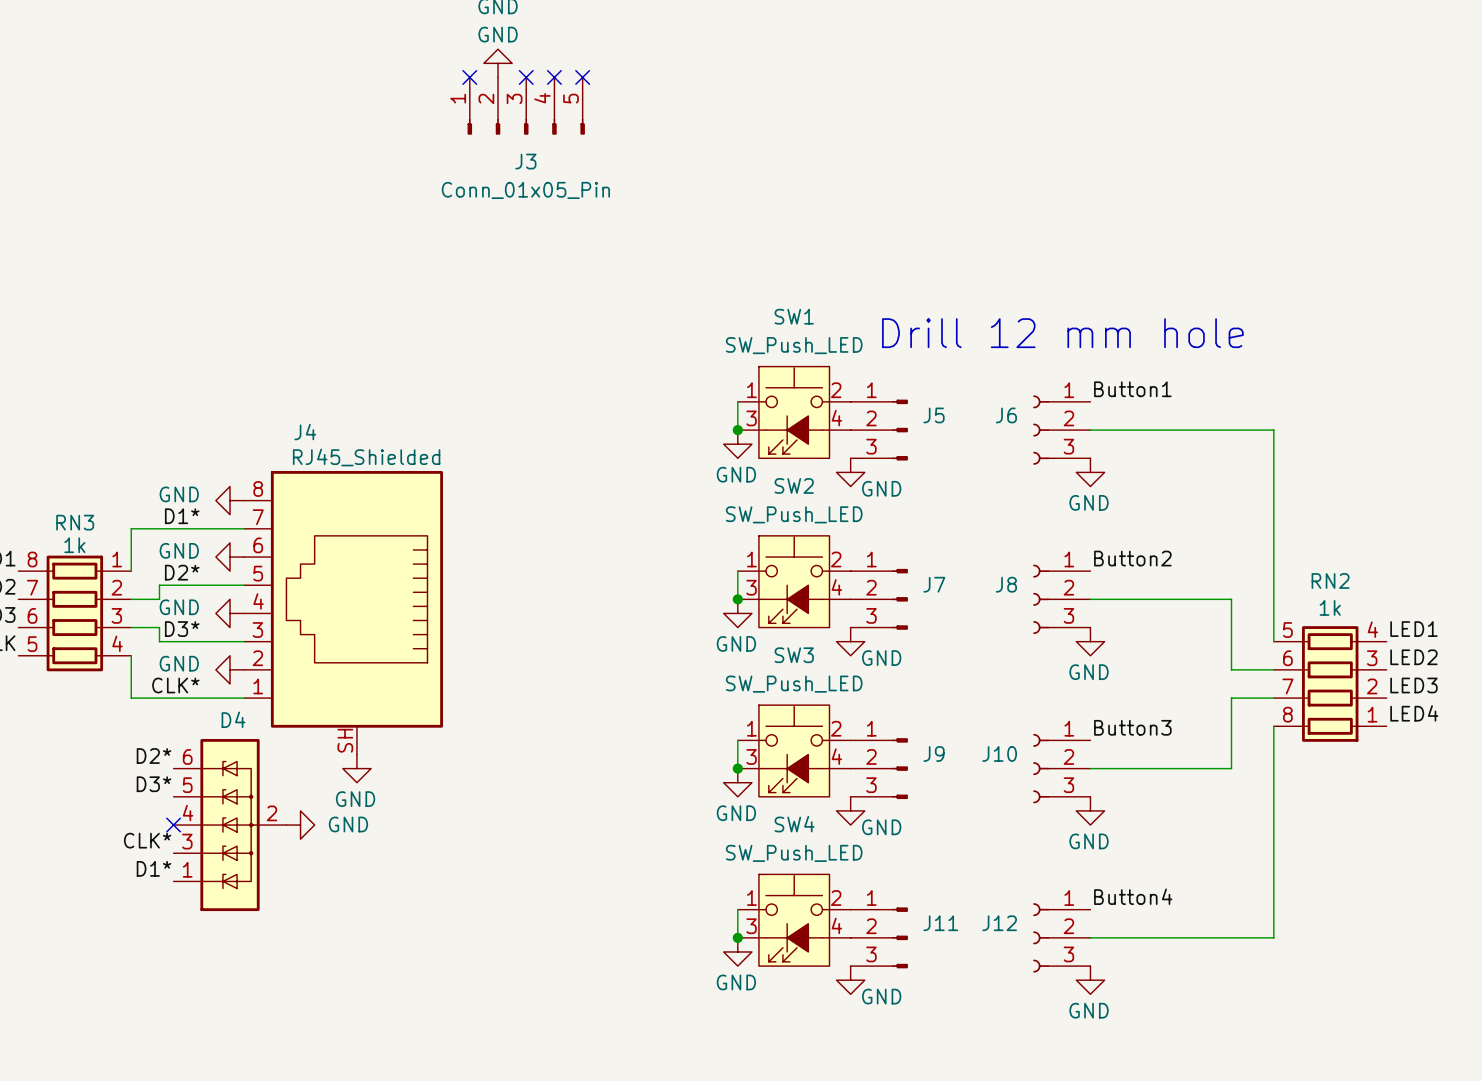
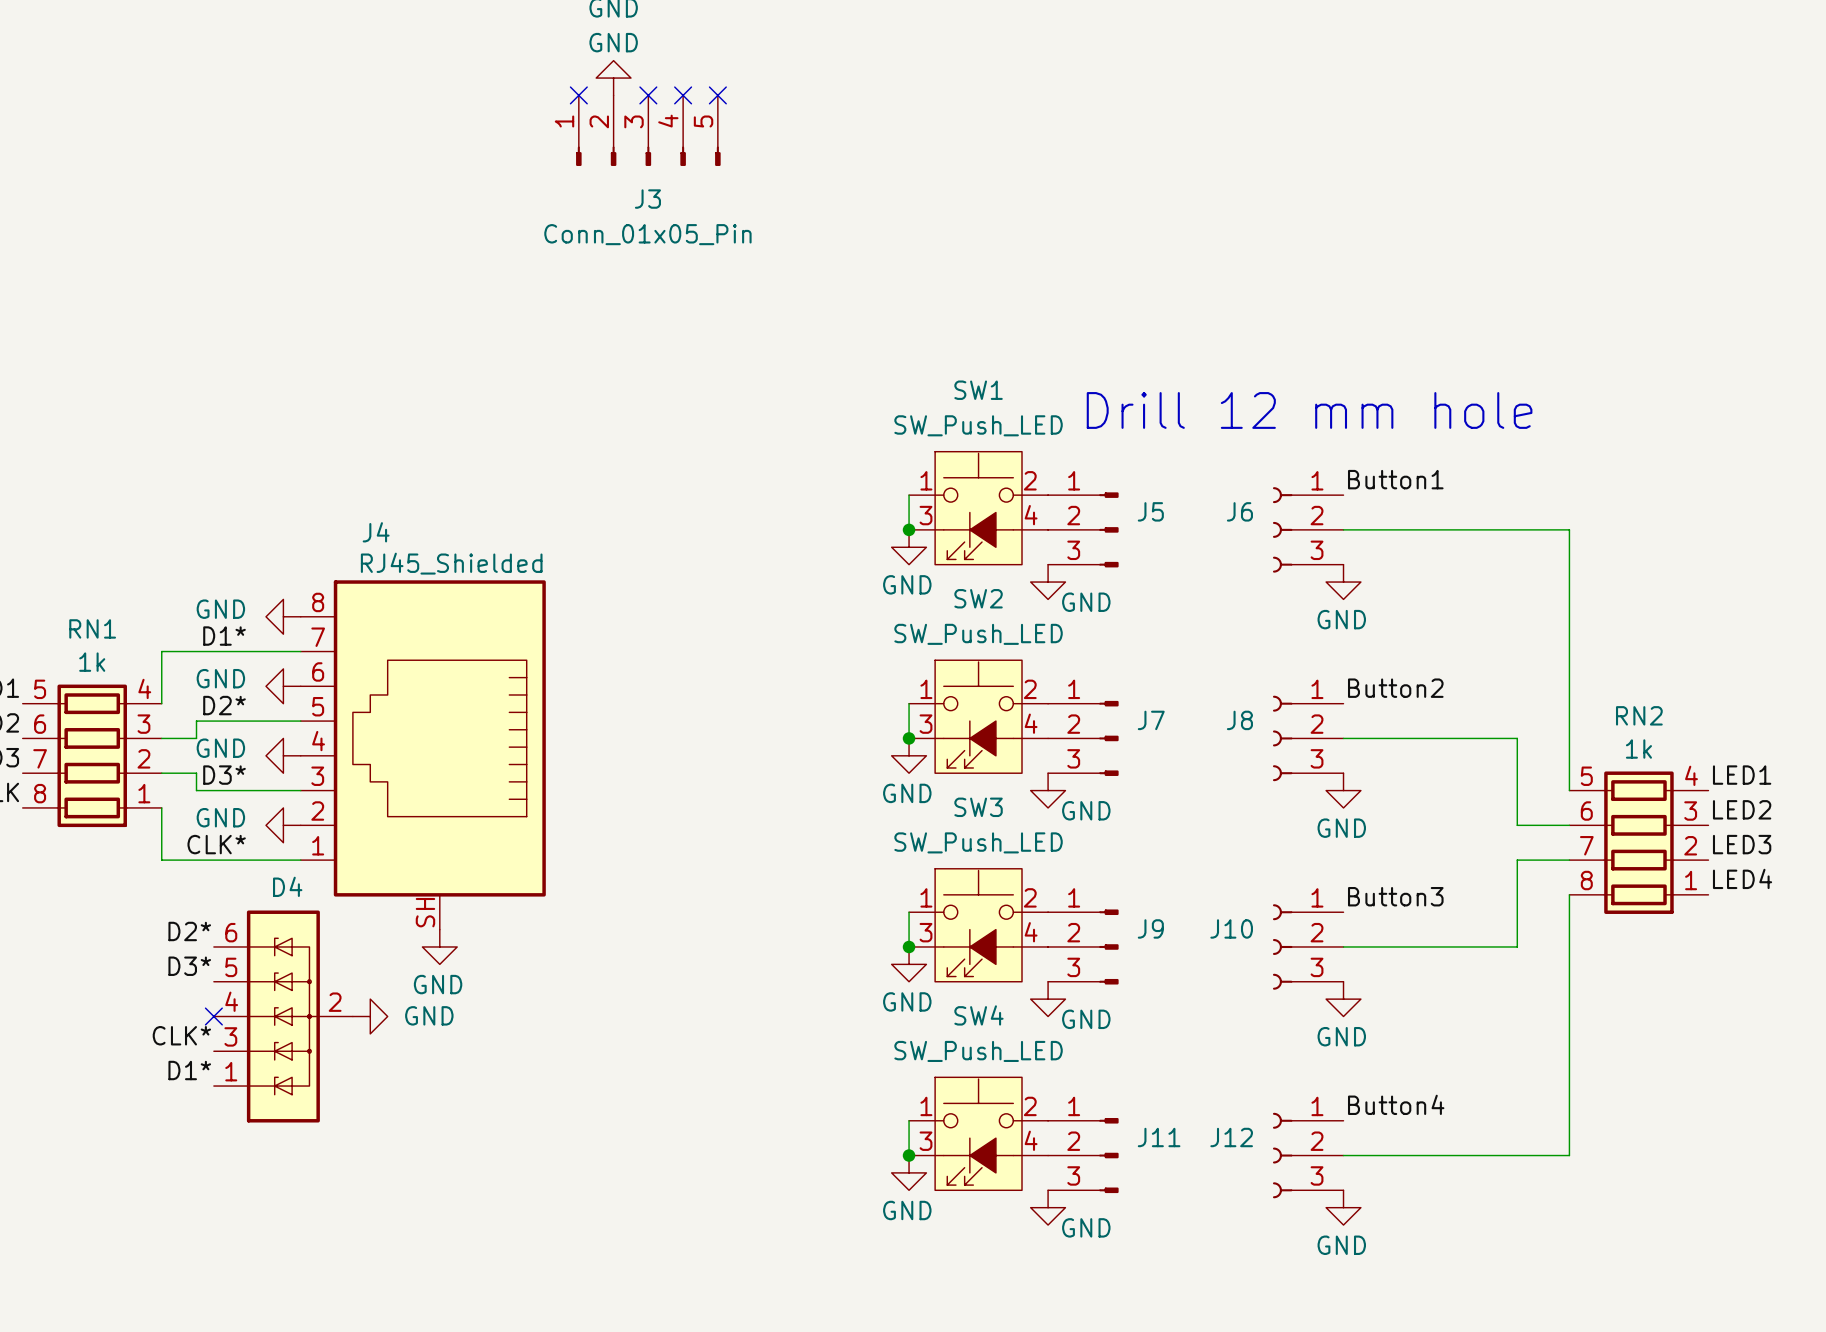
RN3 name: RN3 (75, 522) -> RN1 (92, 628)
RN3 flip: as is (74, 613) -> up-down (92, 755)

